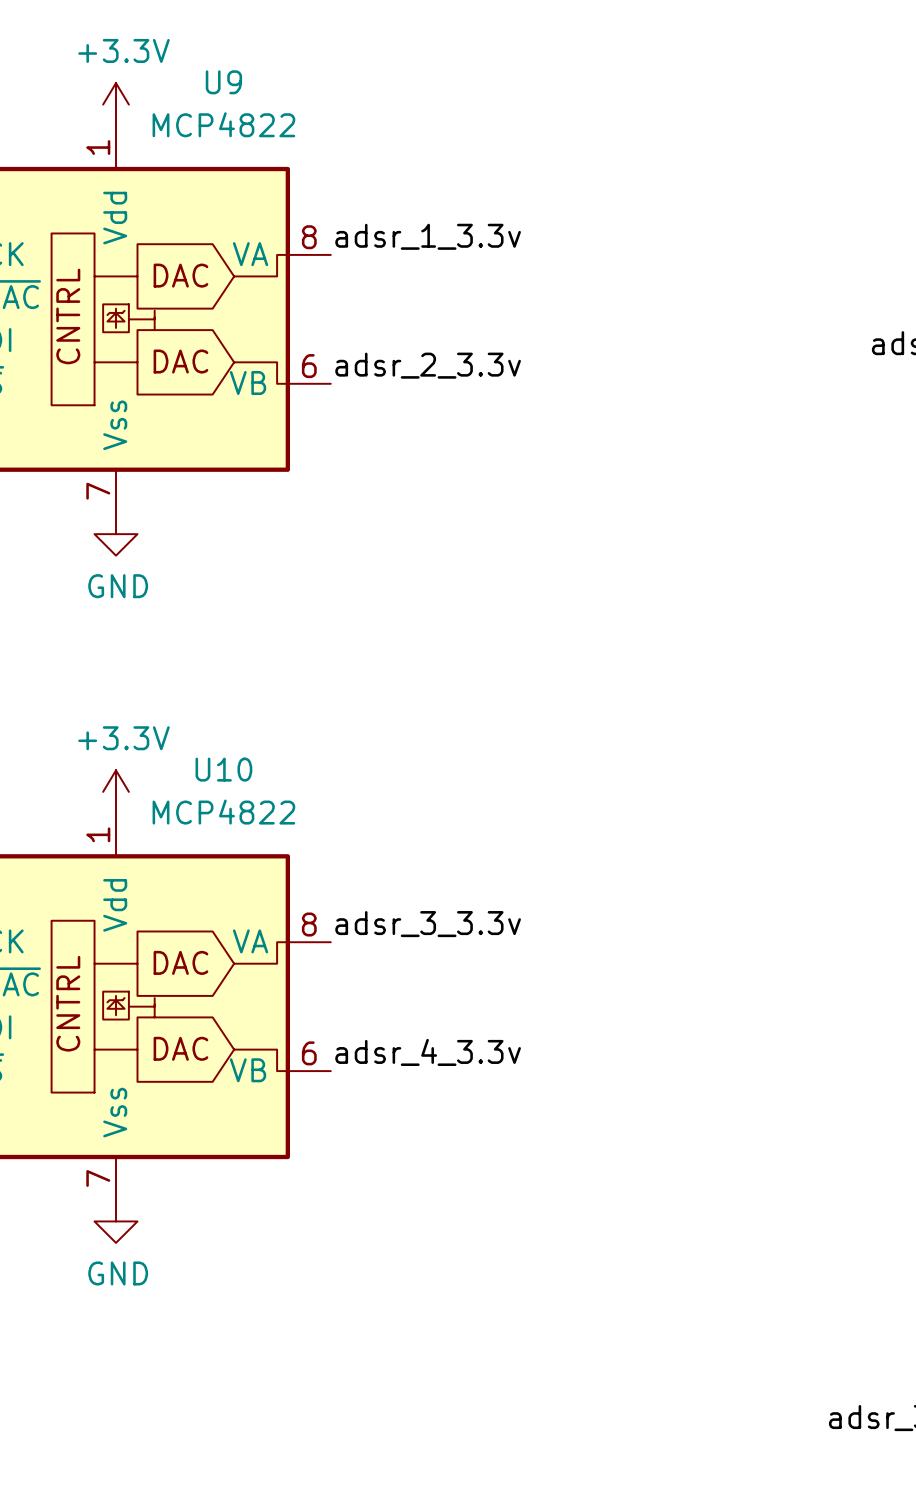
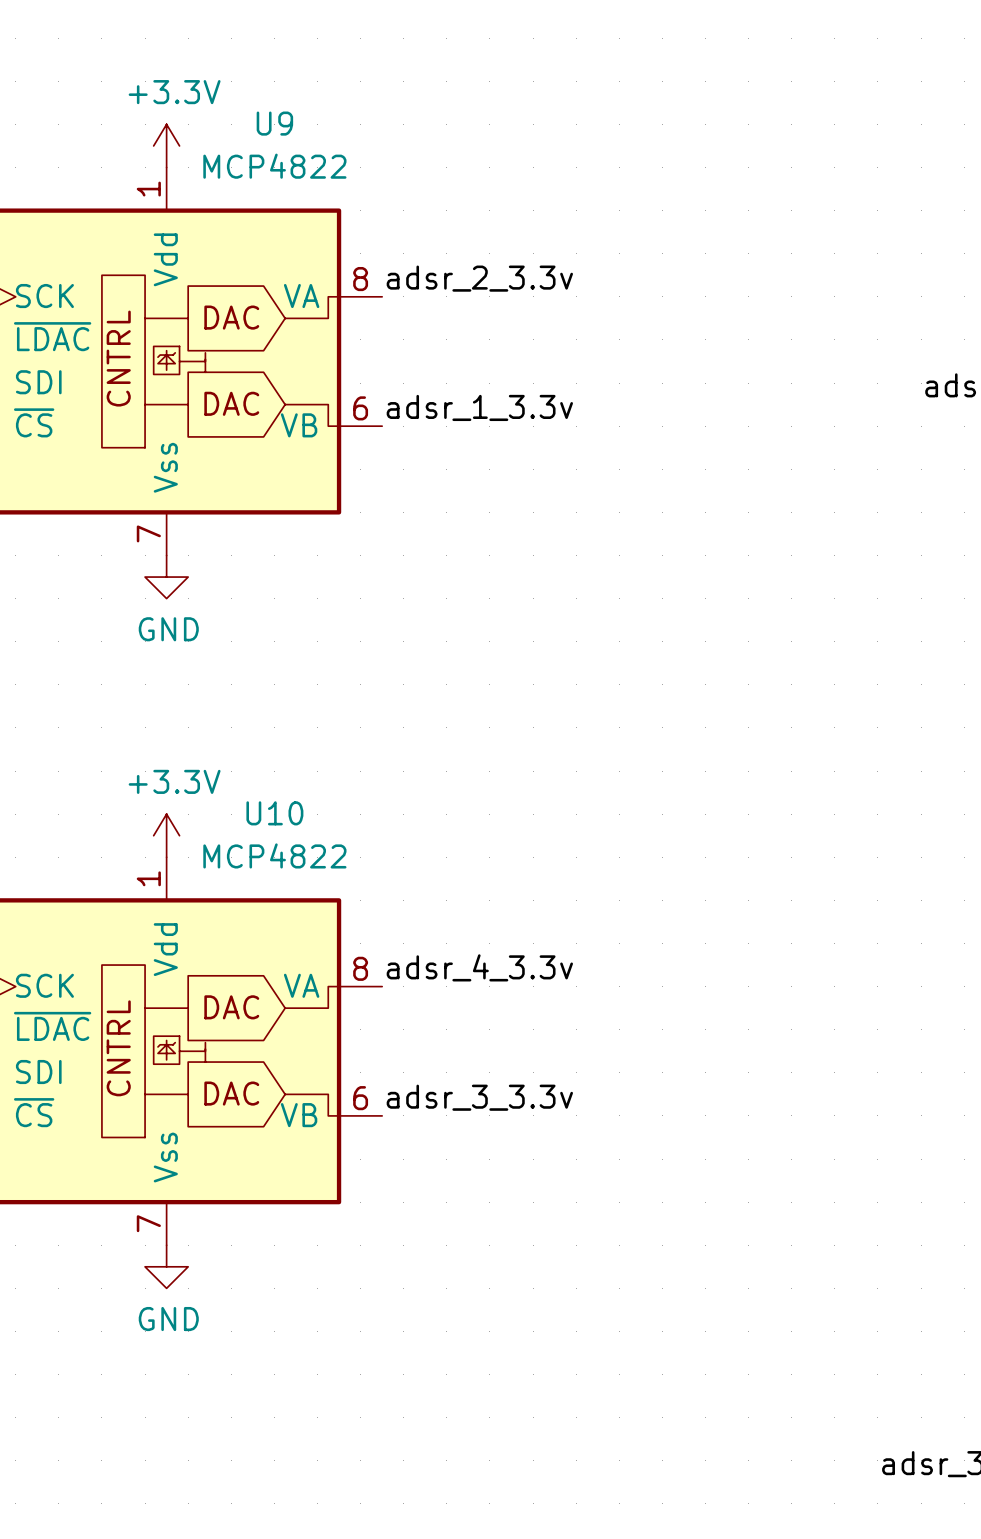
label: adsr_1_3.3v (428, 236) -> adsr_2_3.3v (479, 278)
label: adsr_2_3.3v (428, 365) -> adsr_1_3.3v (479, 407)
label: adsr_3_3.3v (428, 924) -> adsr_4_3.3v (479, 967)
label: adsr_4_3.3v (428, 1052) -> adsr_3_3.3v (479, 1097)

